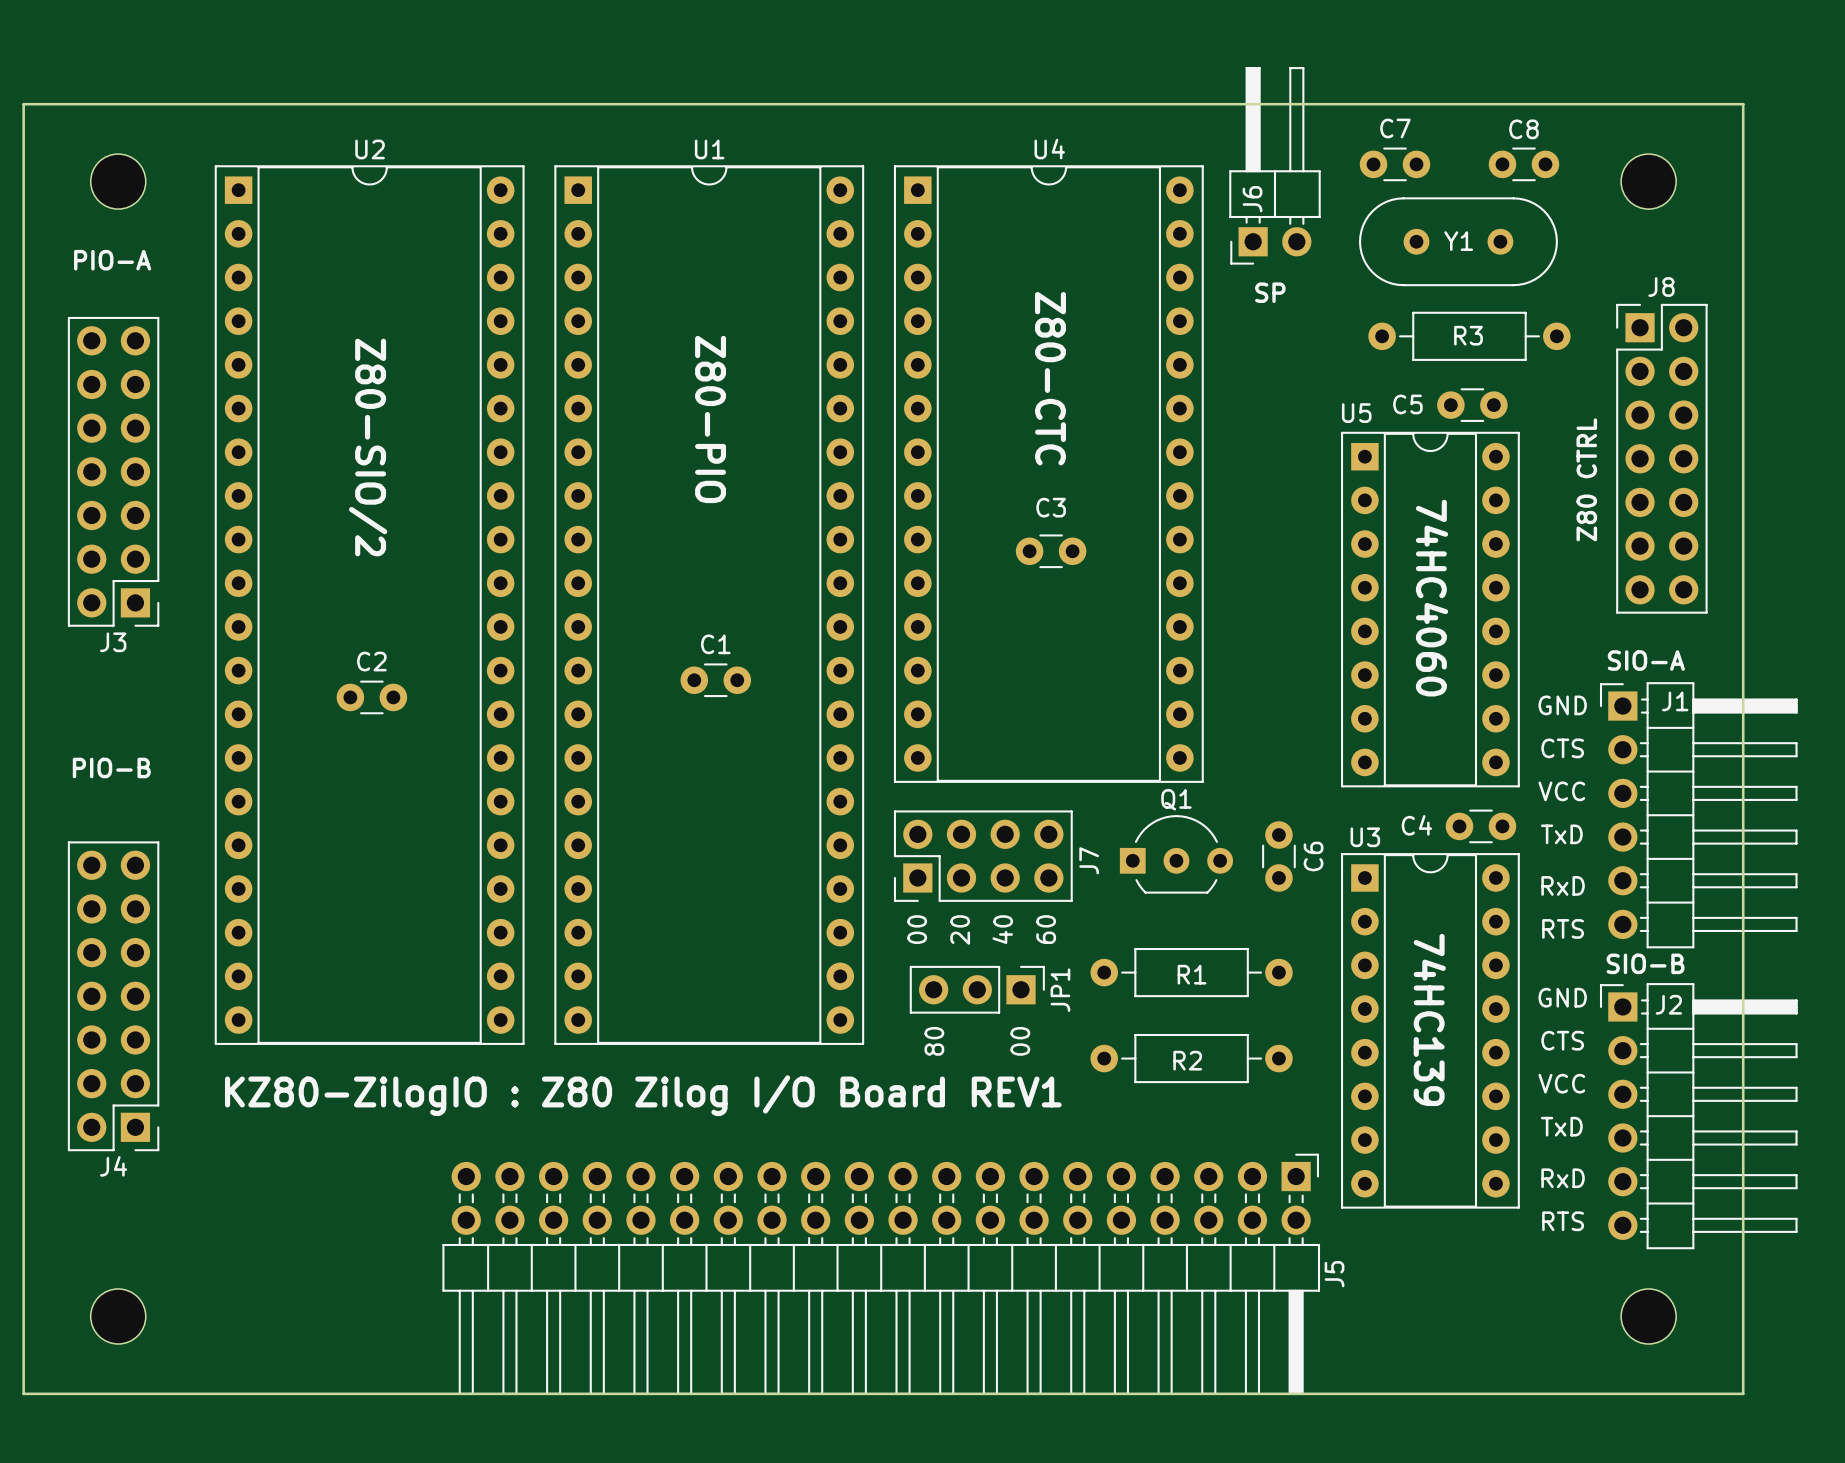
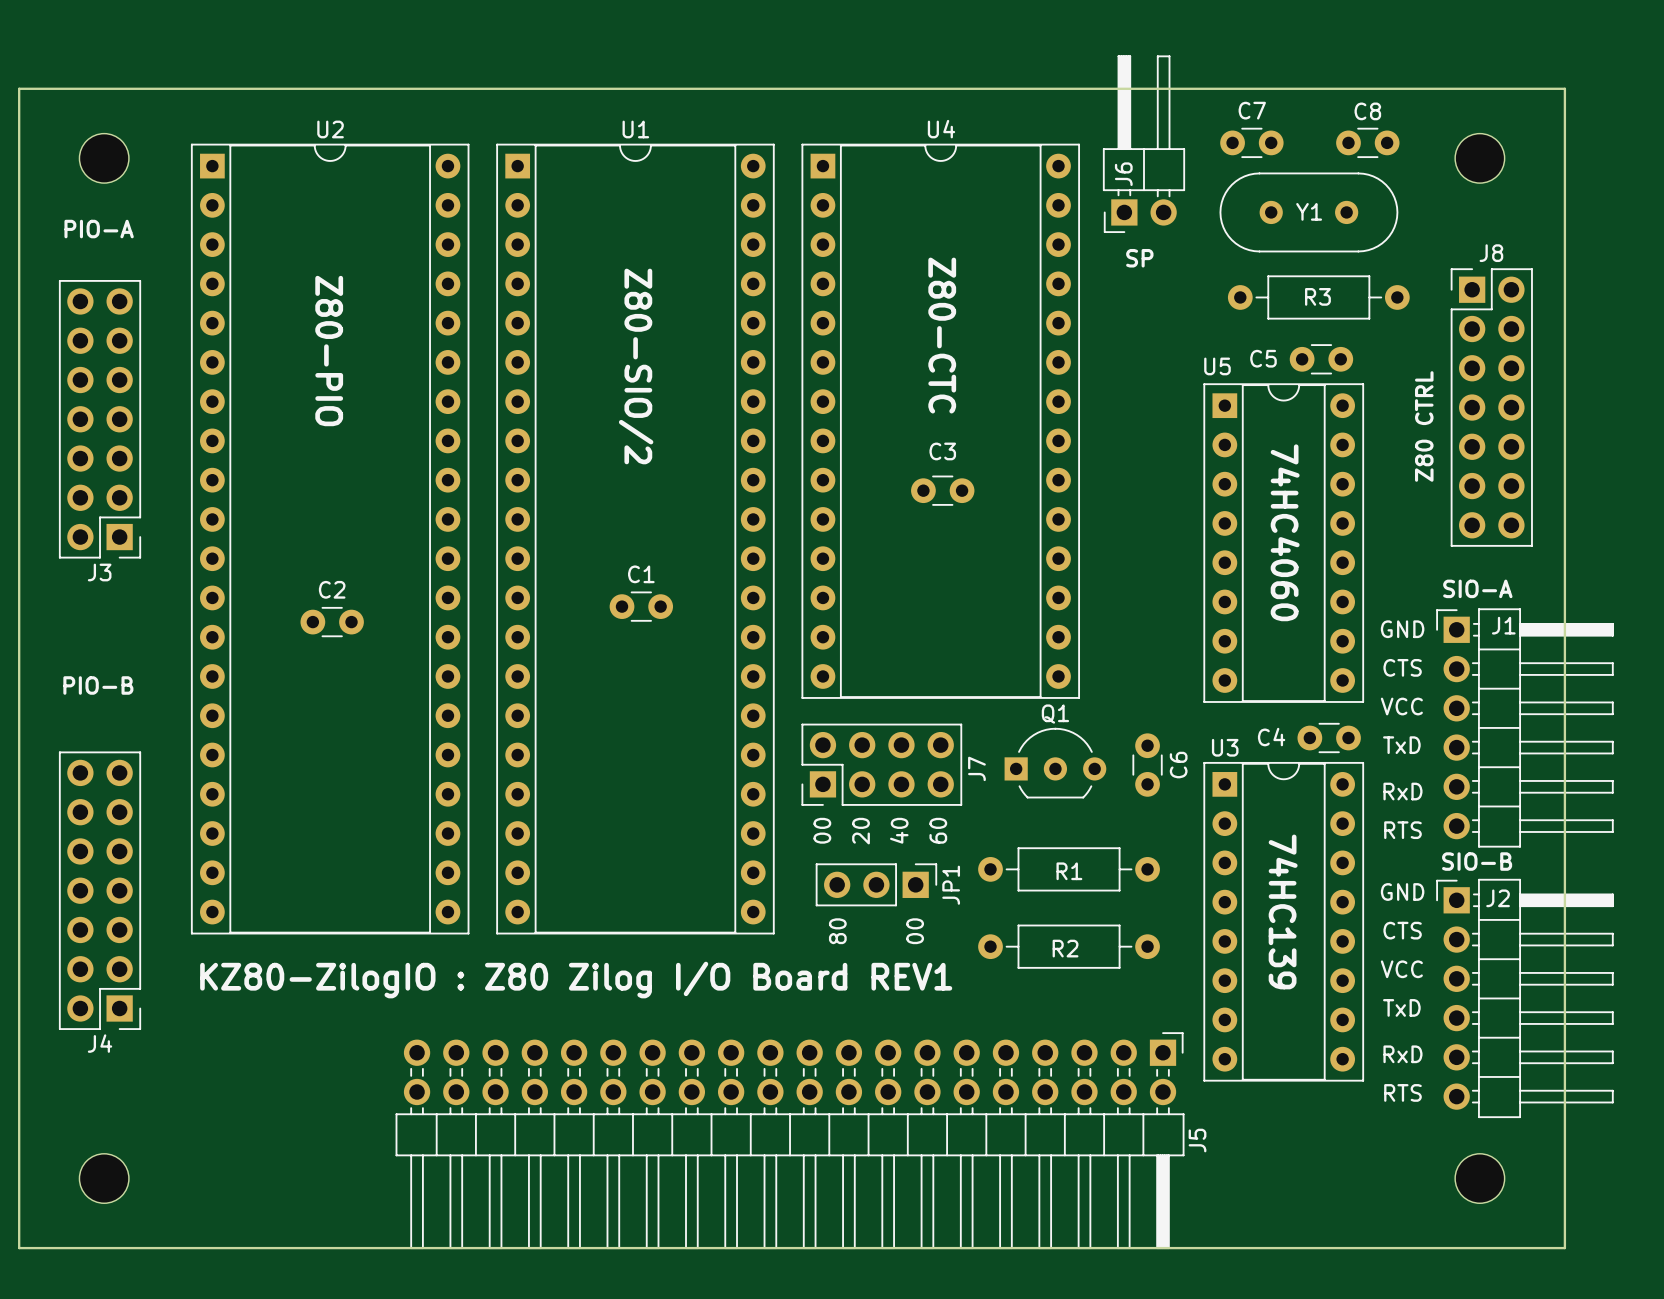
text: Z80-PIO (710, 419) -> Z80-SIO/2 (636, 366)
text: Z80-SIO/2 (368, 447) -> Z80-PIO (329, 351)

